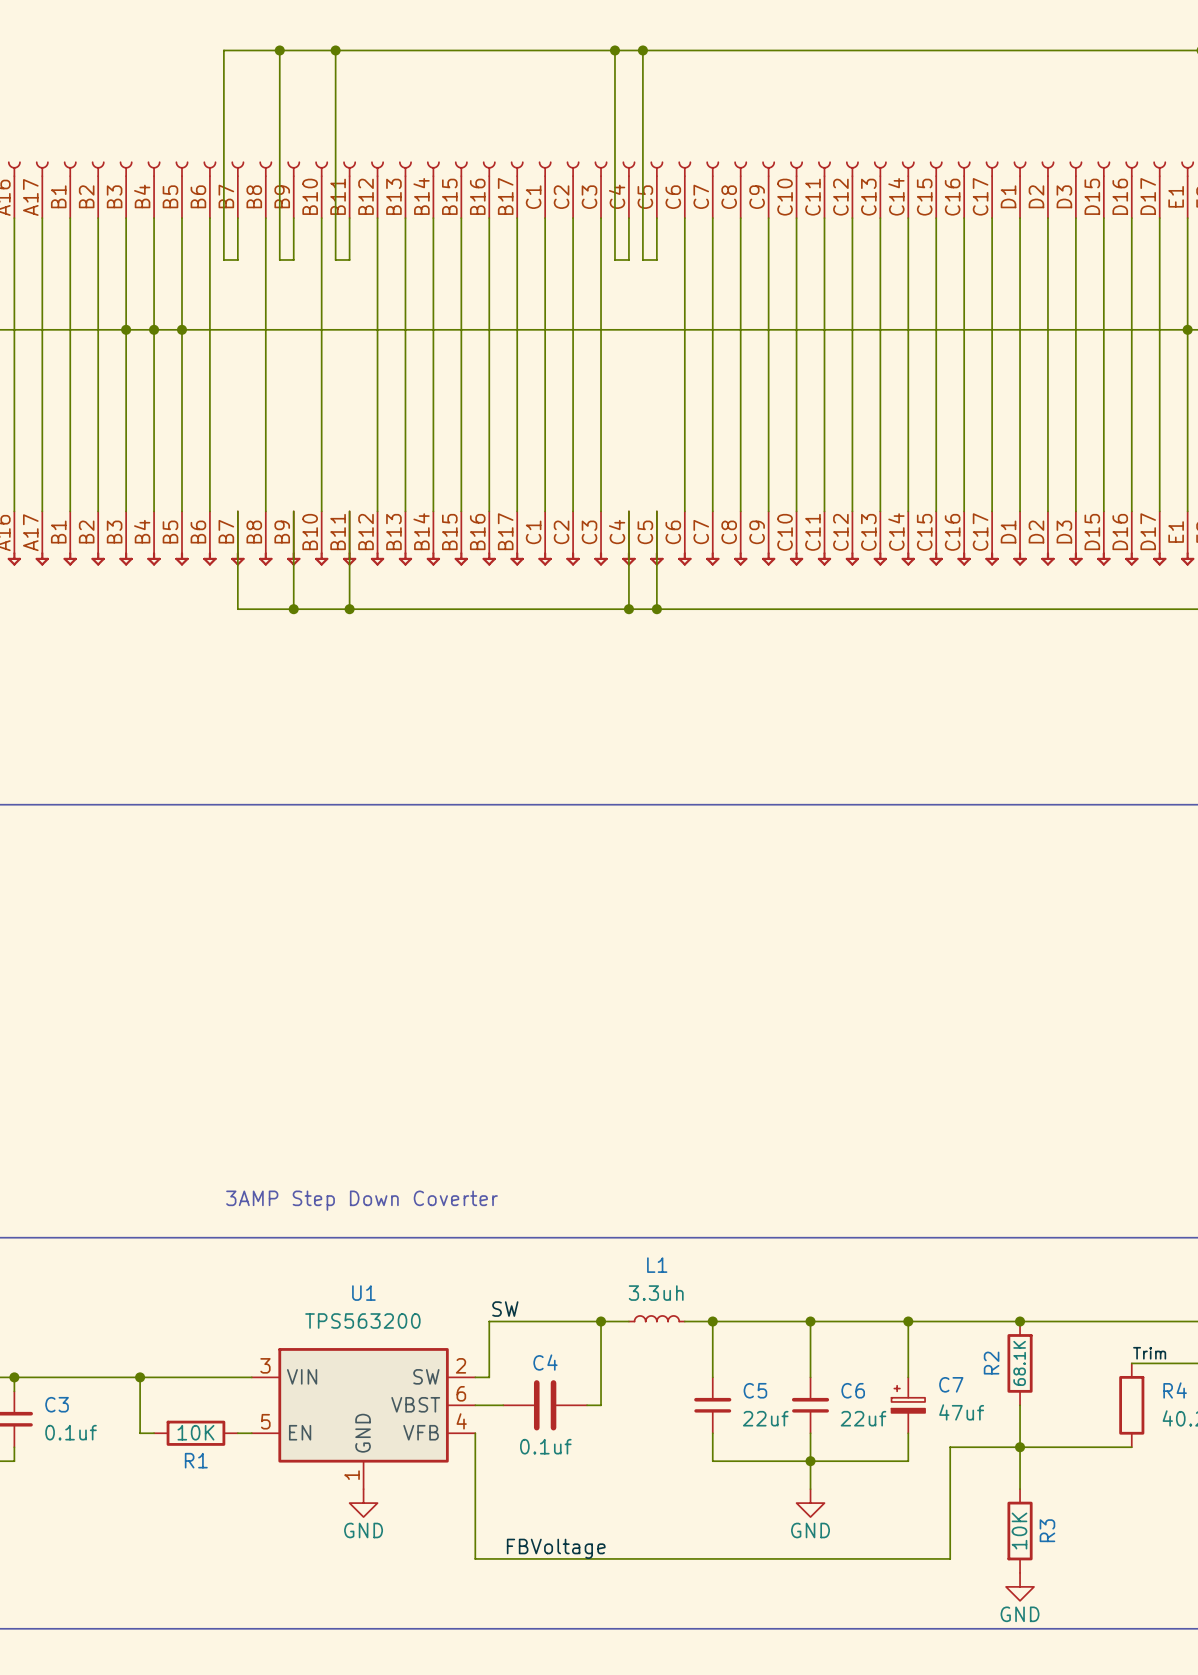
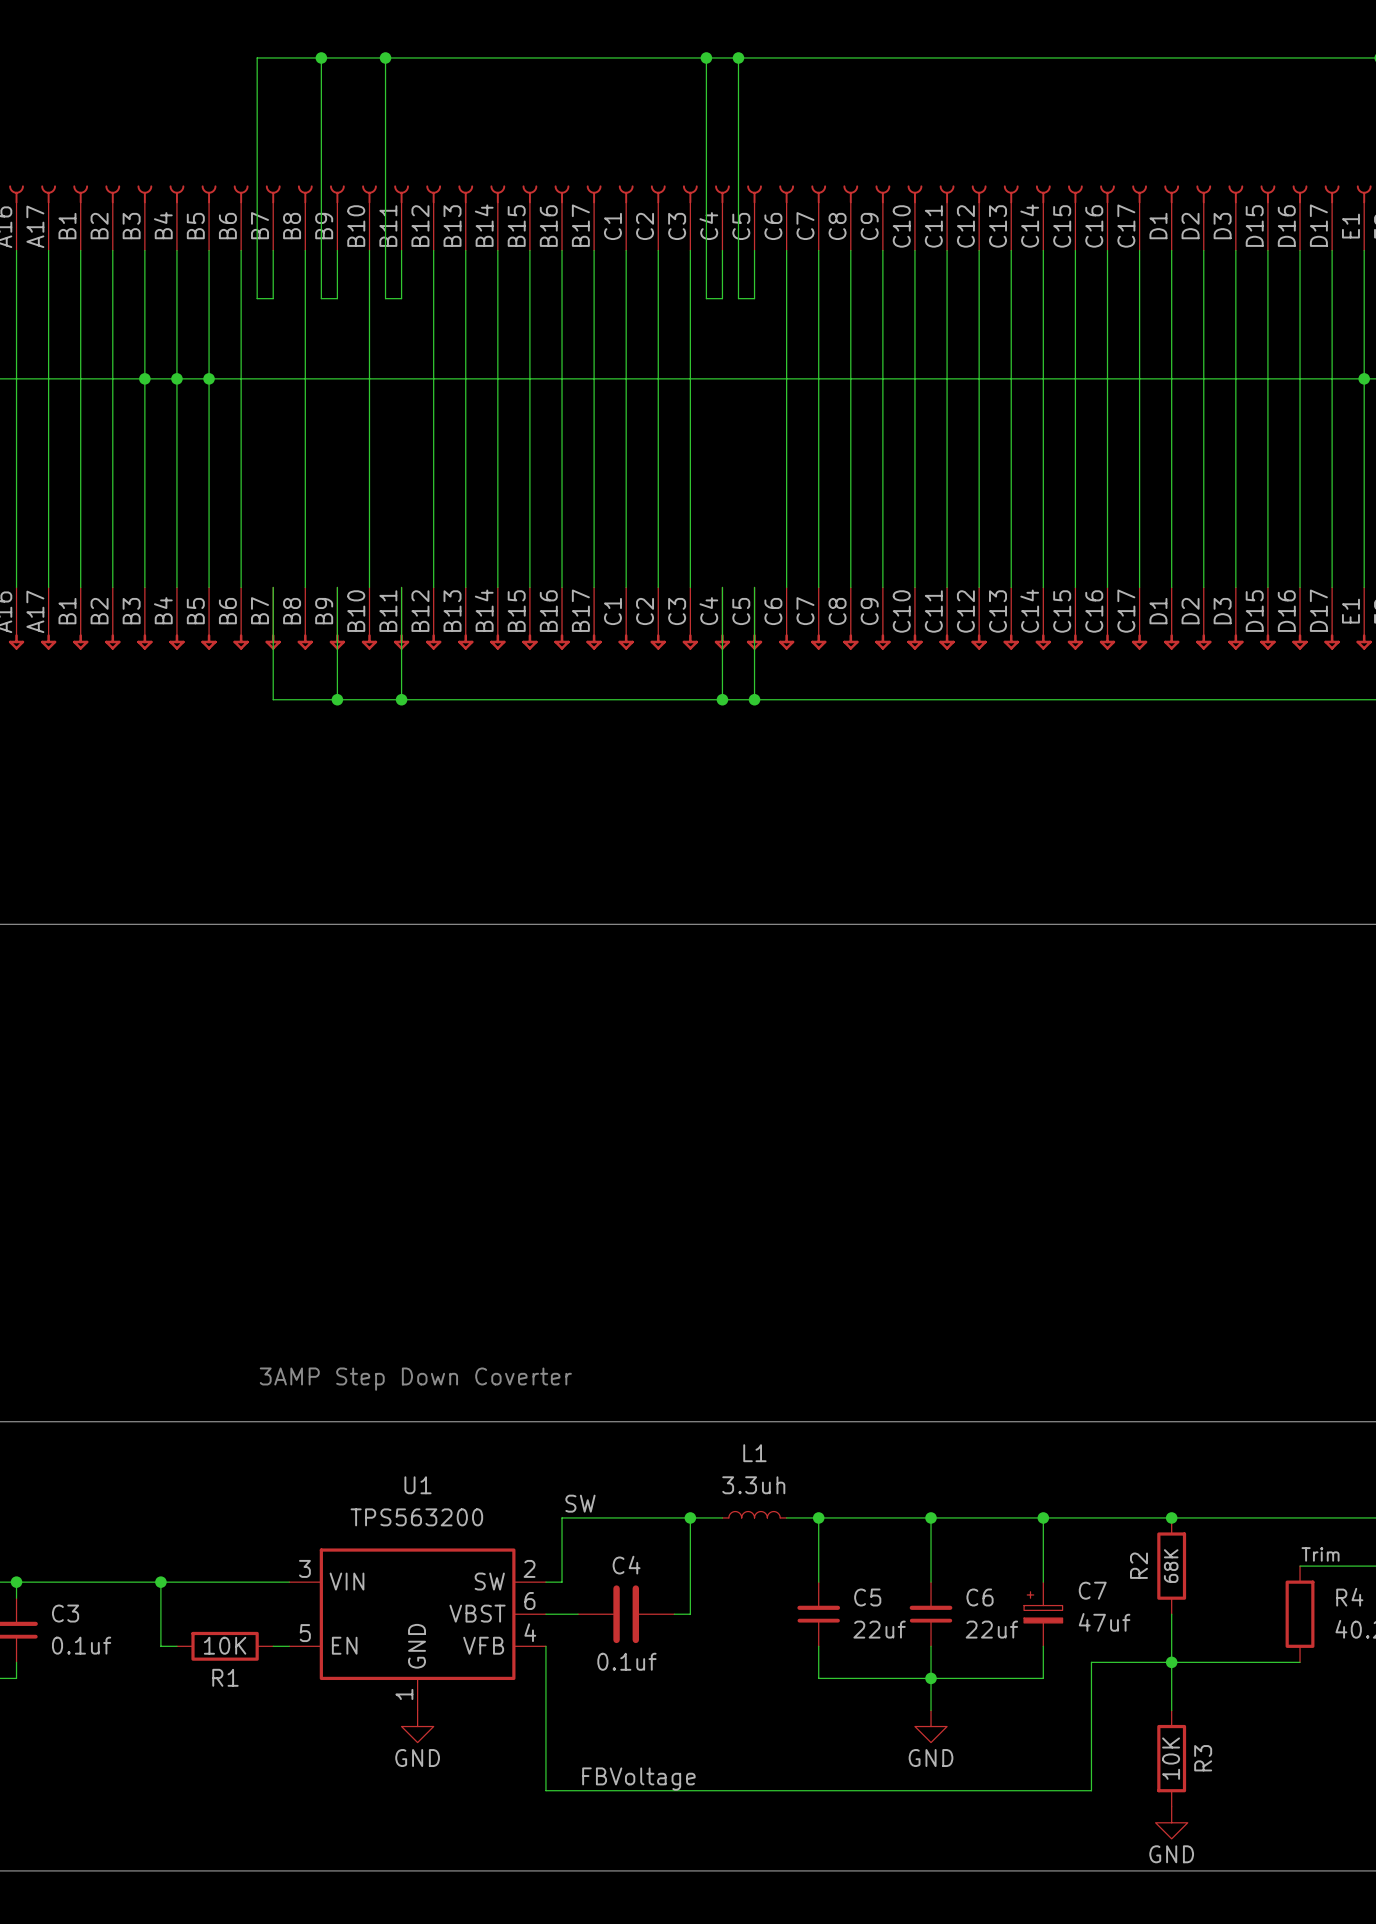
R2 value: 68.1K (1019, 1363) -> 68K (1171, 1566)

